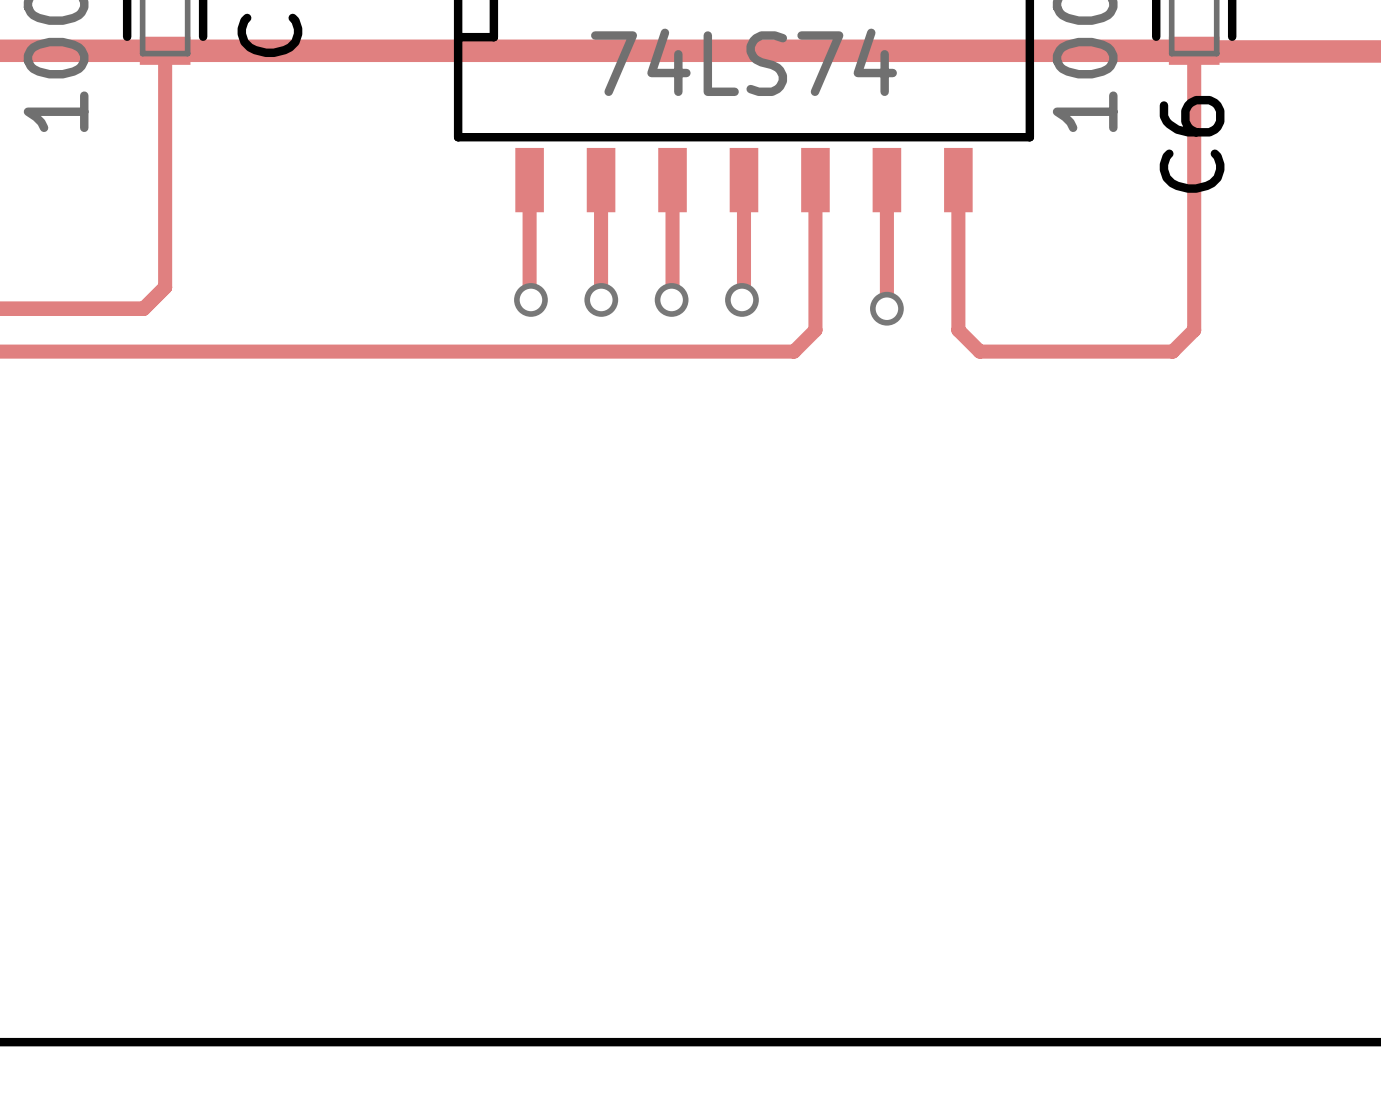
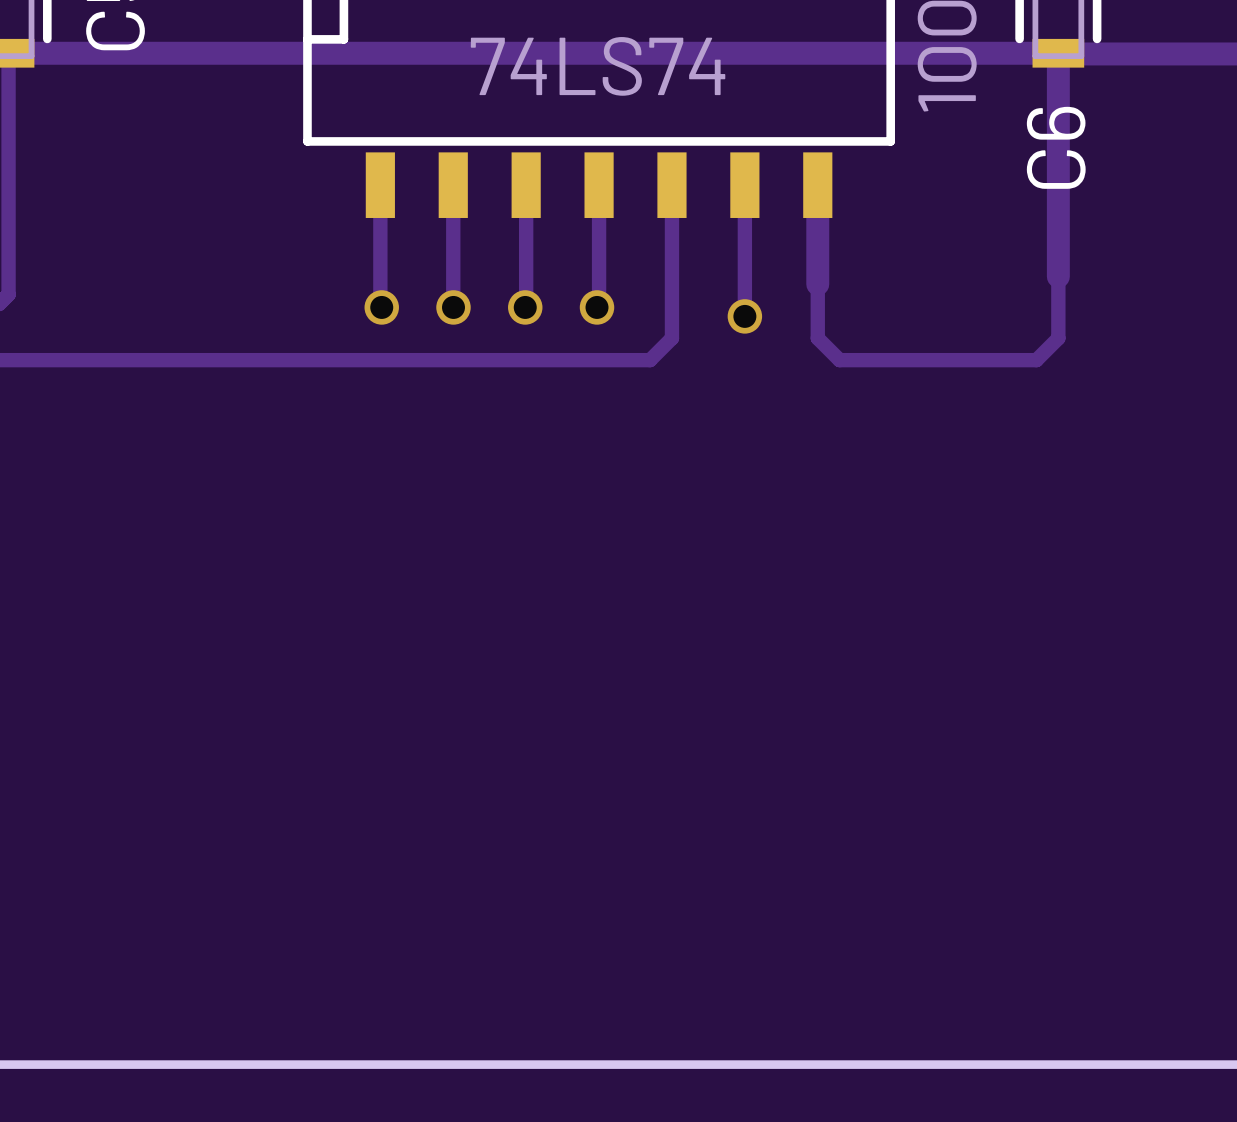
track width: thin (1194, 50) (1194, 269) -> thick (1058, 53) (1058, 276)
track width: thin (958, 180) (958, 277) -> thick (817, 185) (817, 284)

